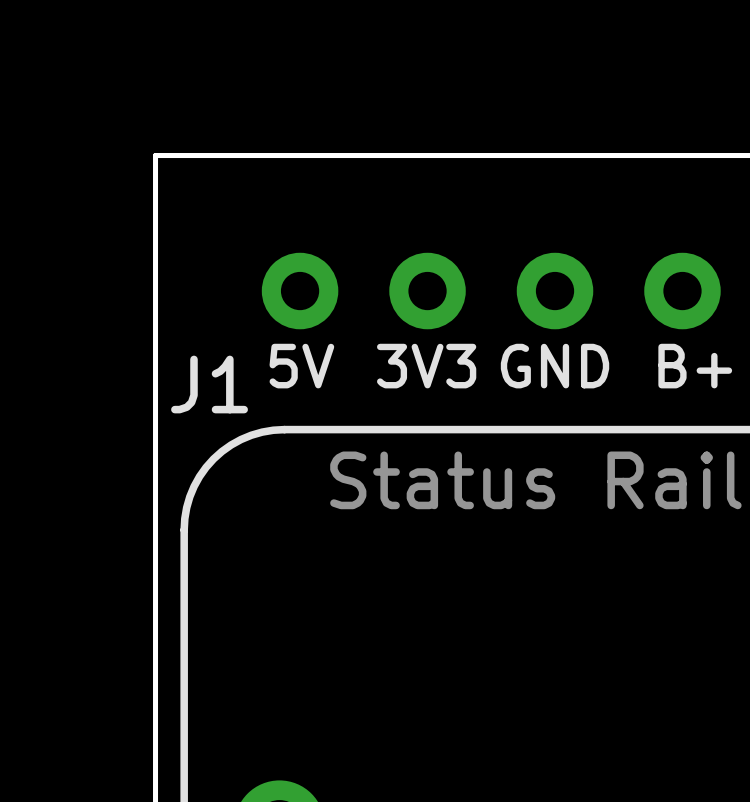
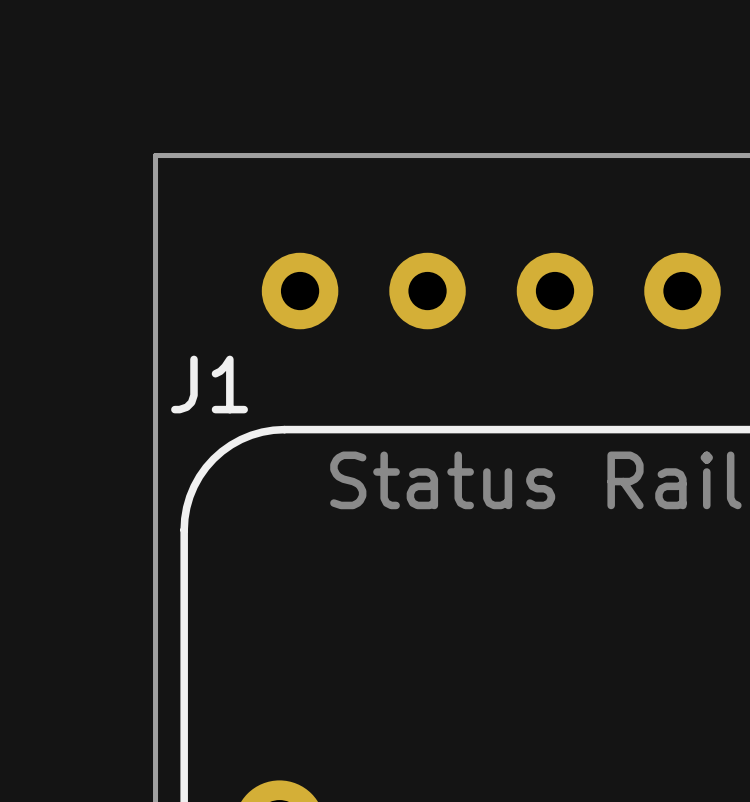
J1 text: 5V (301, 366) -> none
J1 text: 3V3 (426, 366) -> none
J1 text: GND (555, 366) -> none
J1 text: B+ (695, 366) -> none

